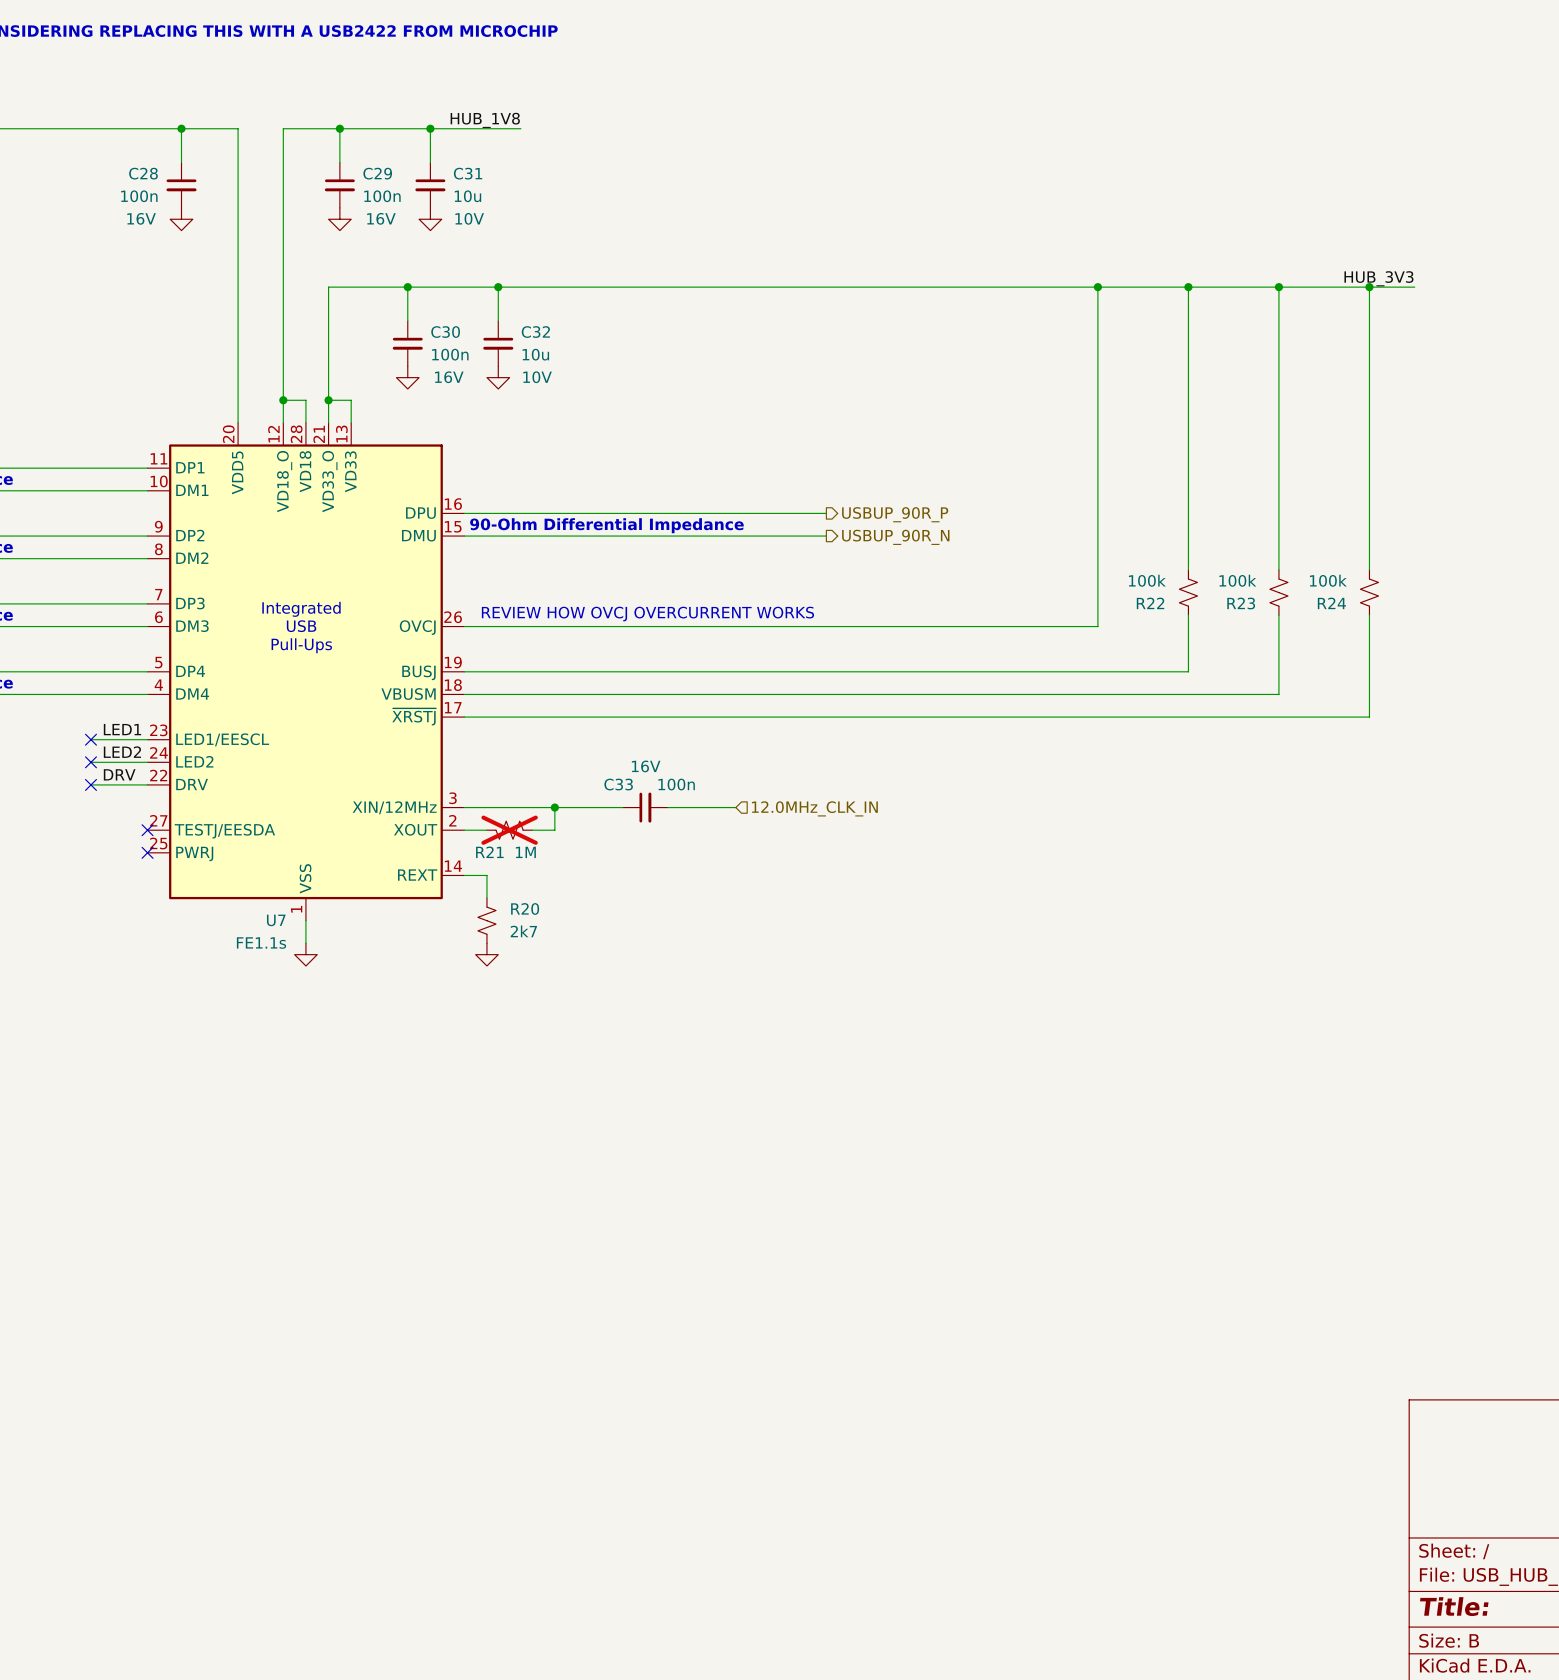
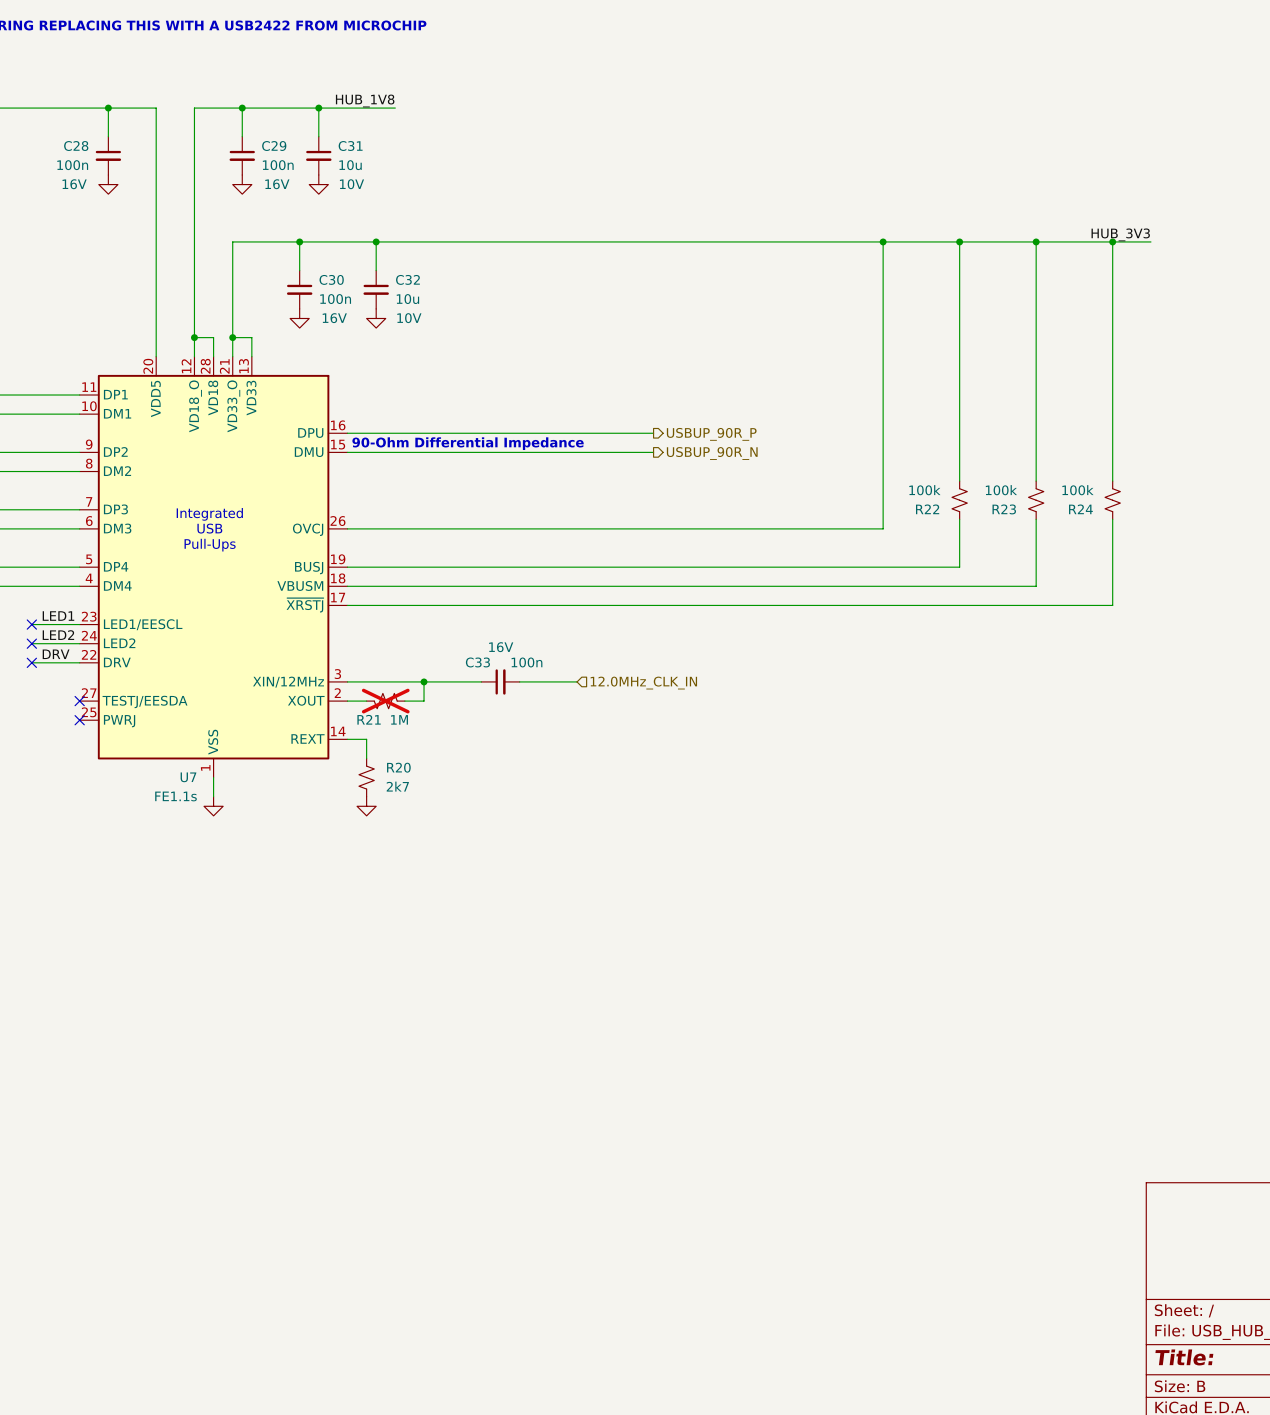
text: REVIEW HOW OVCJ OVERCURRENT WORKS (647, 614) -> none

